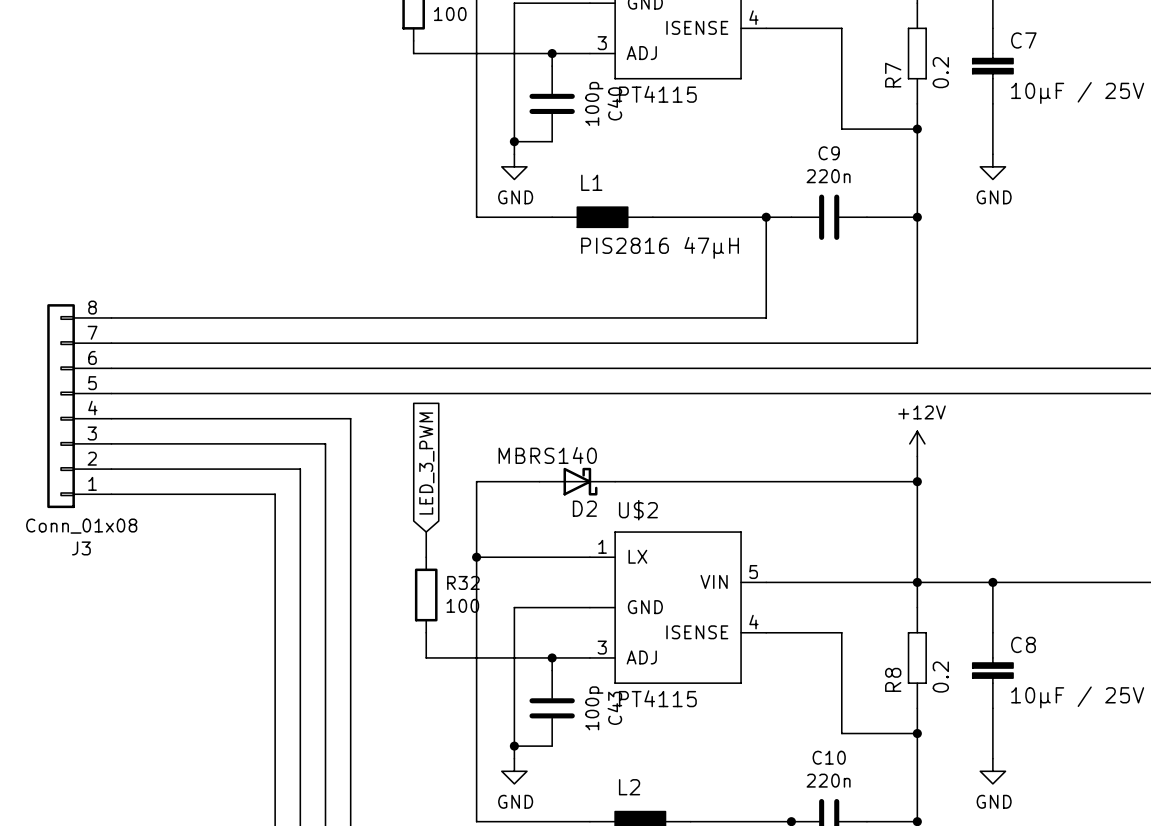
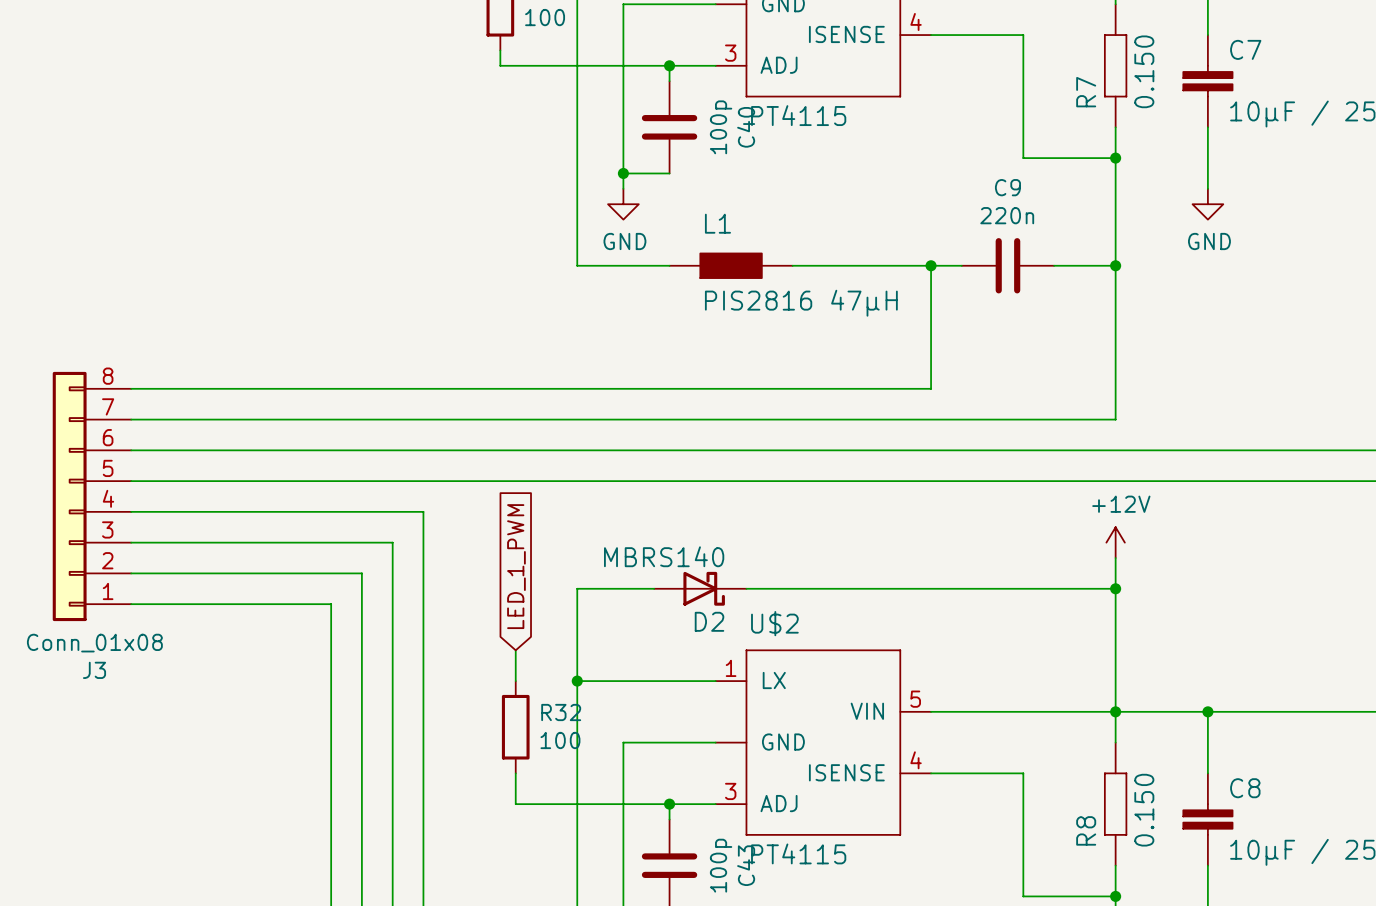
R7 value: 0.2 (940, 72) -> 0.150 (1144, 71)
global label: LED_3_PWM (426, 463) -> LED_1_PWM (516, 566)
R8 value: 0.2 (940, 677) -> 0.150 (1144, 810)

